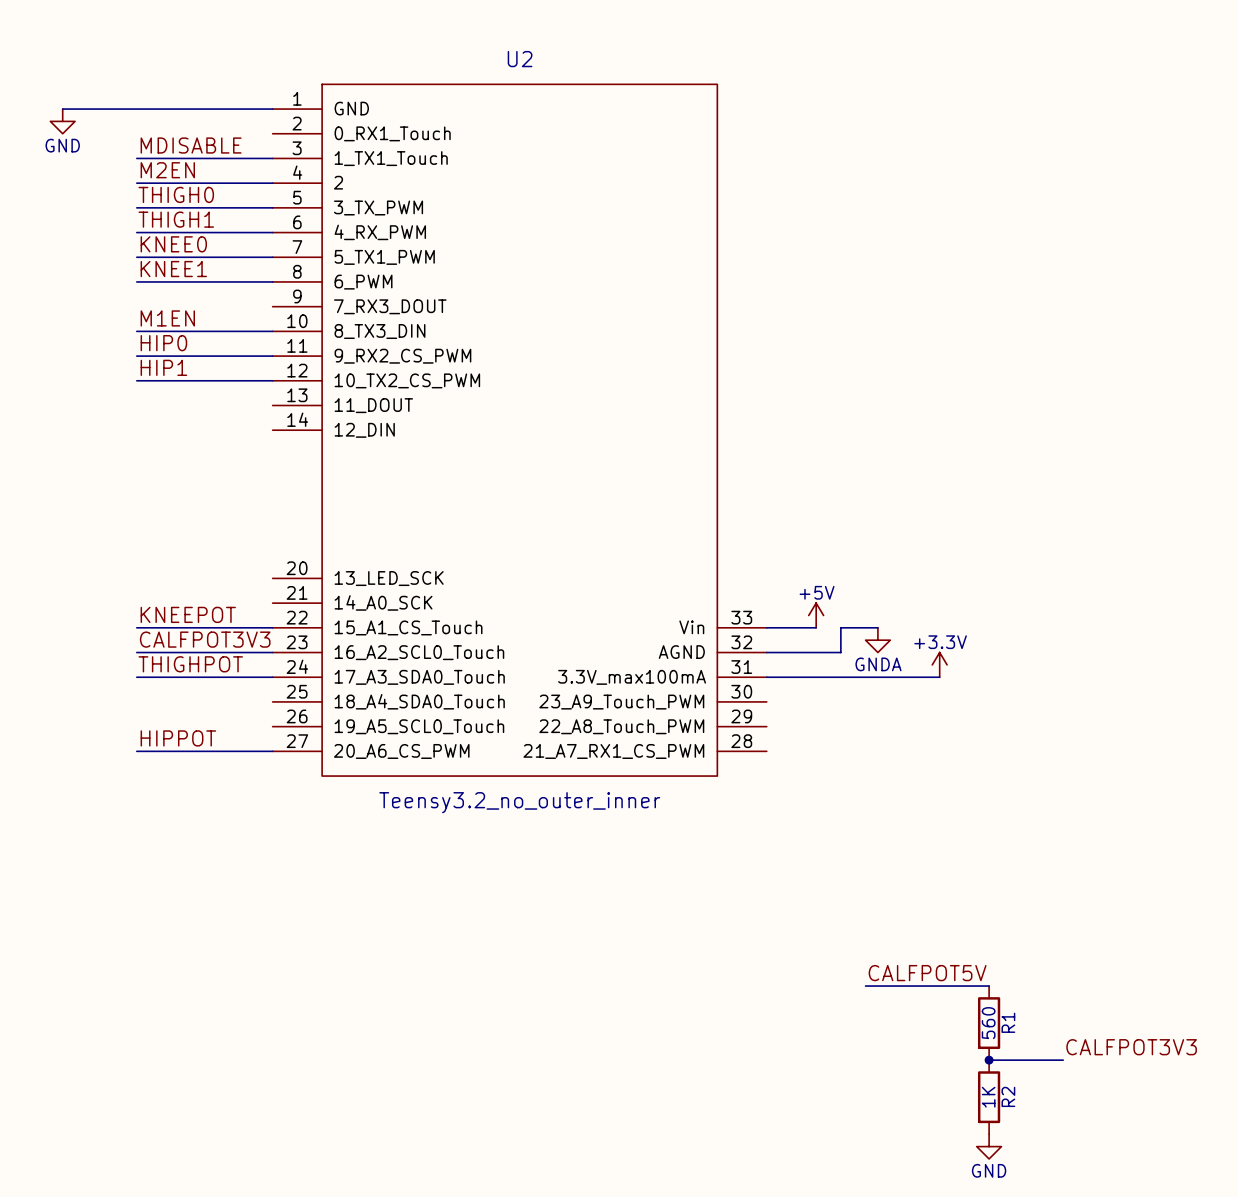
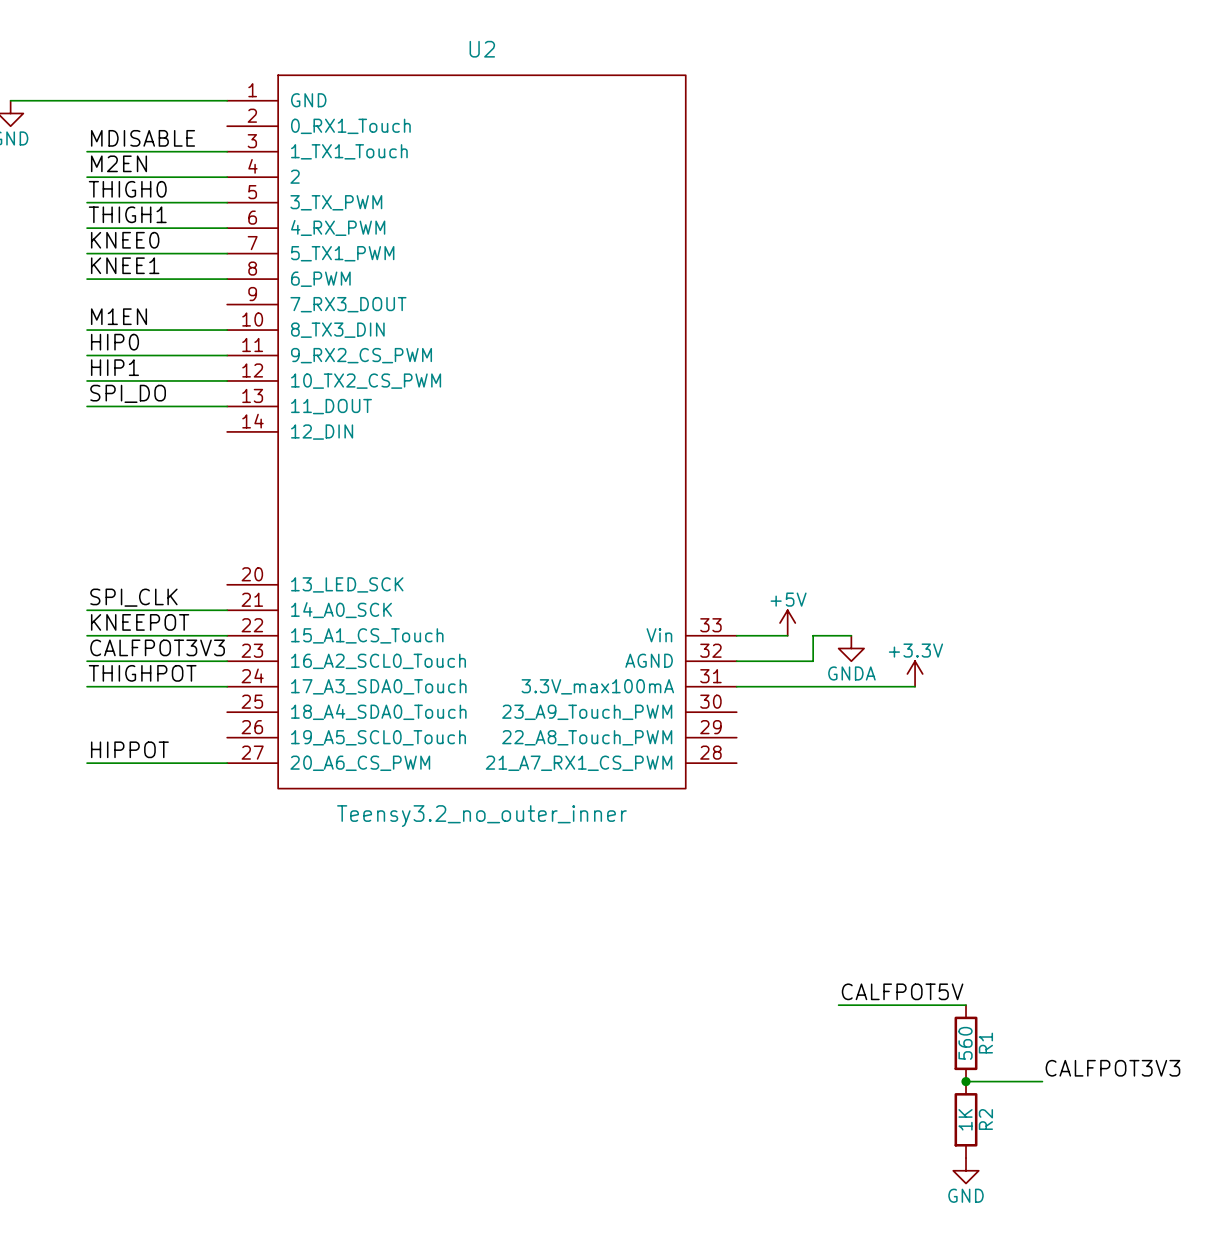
label: none -> SPI_DO (128, 393)
wire: none -> (87, 406) (227, 406)
label: none -> SPI_CLK (133, 597)
wire: none -> (87, 610) (227, 610)

